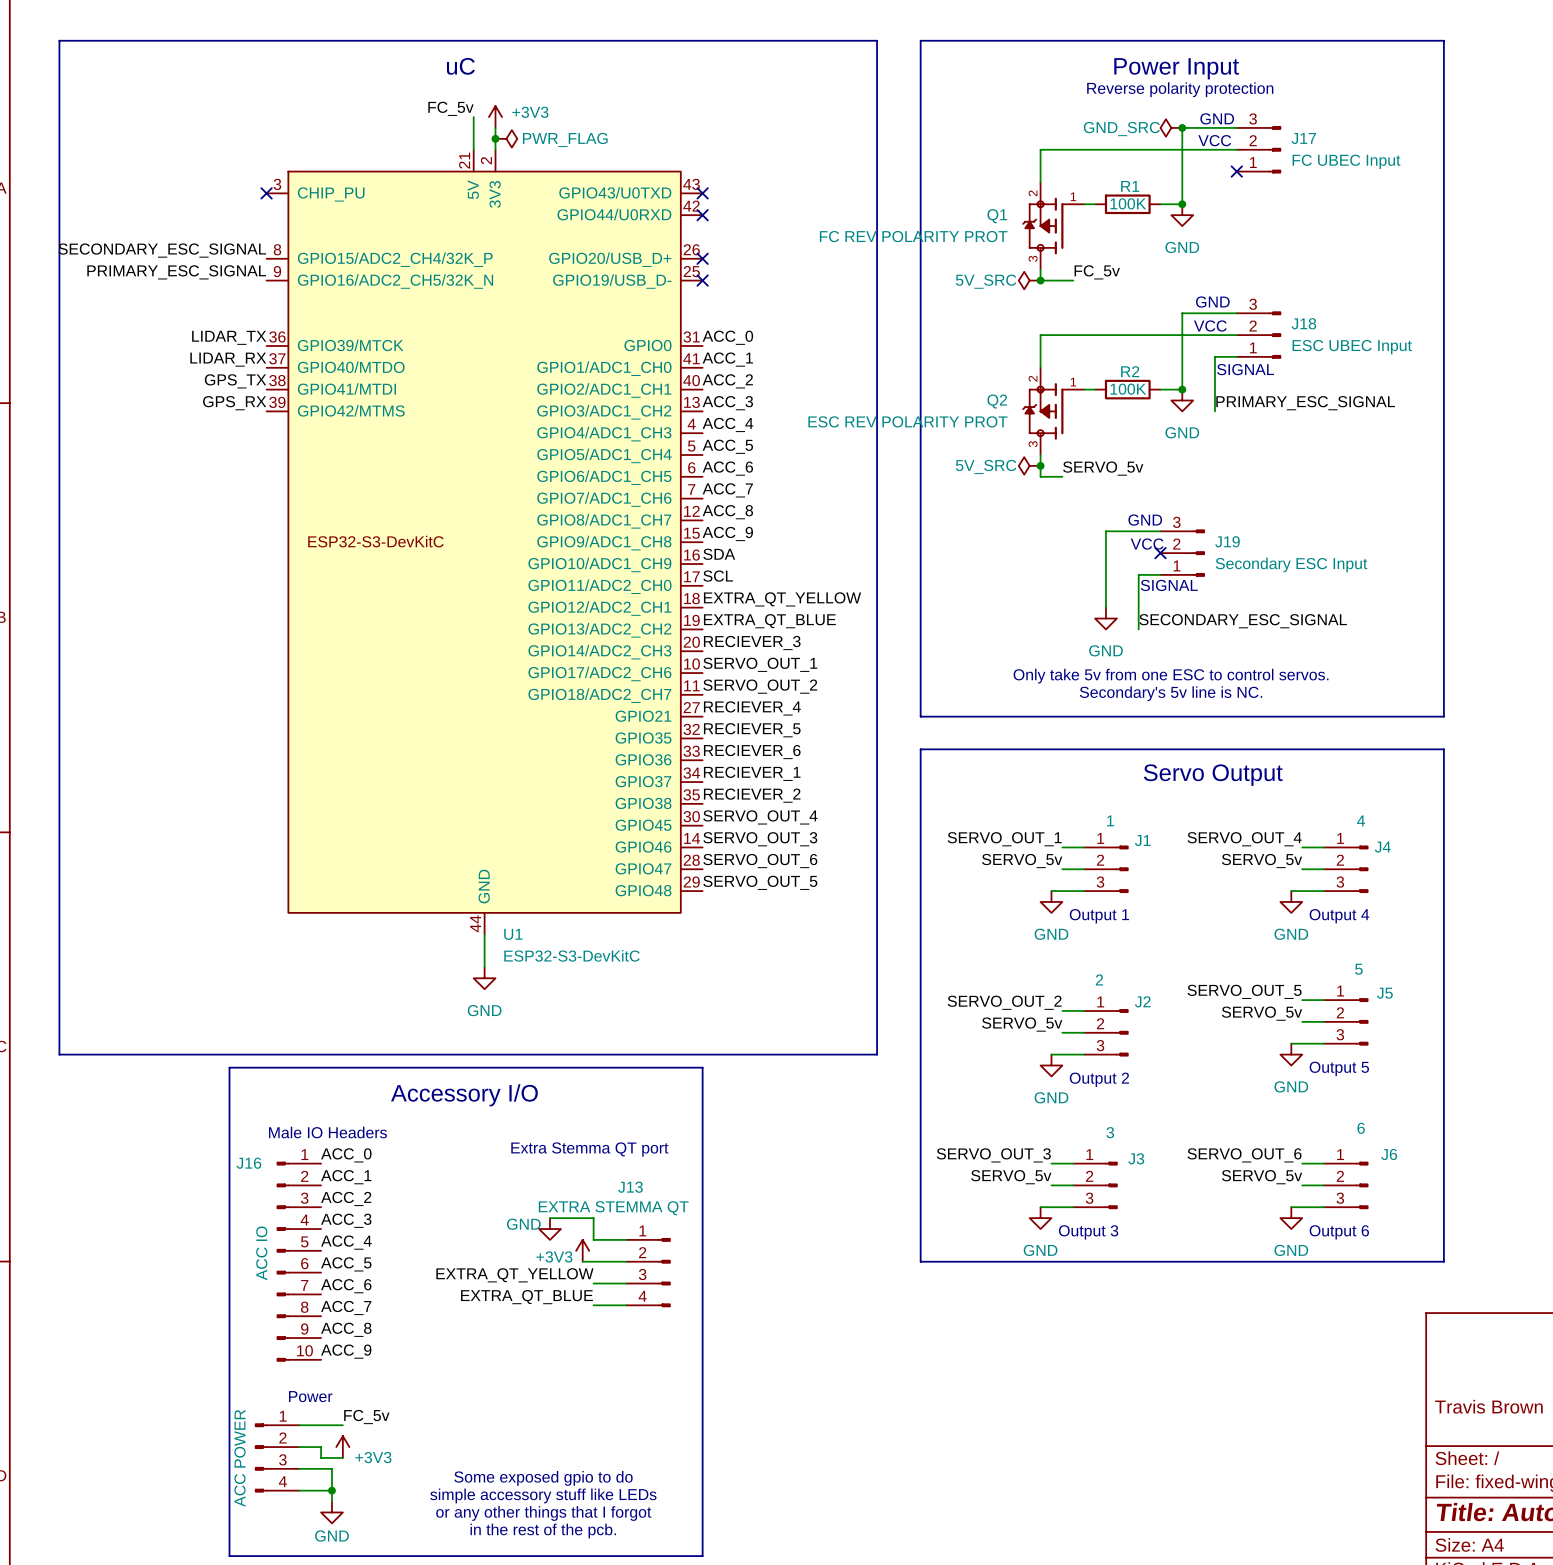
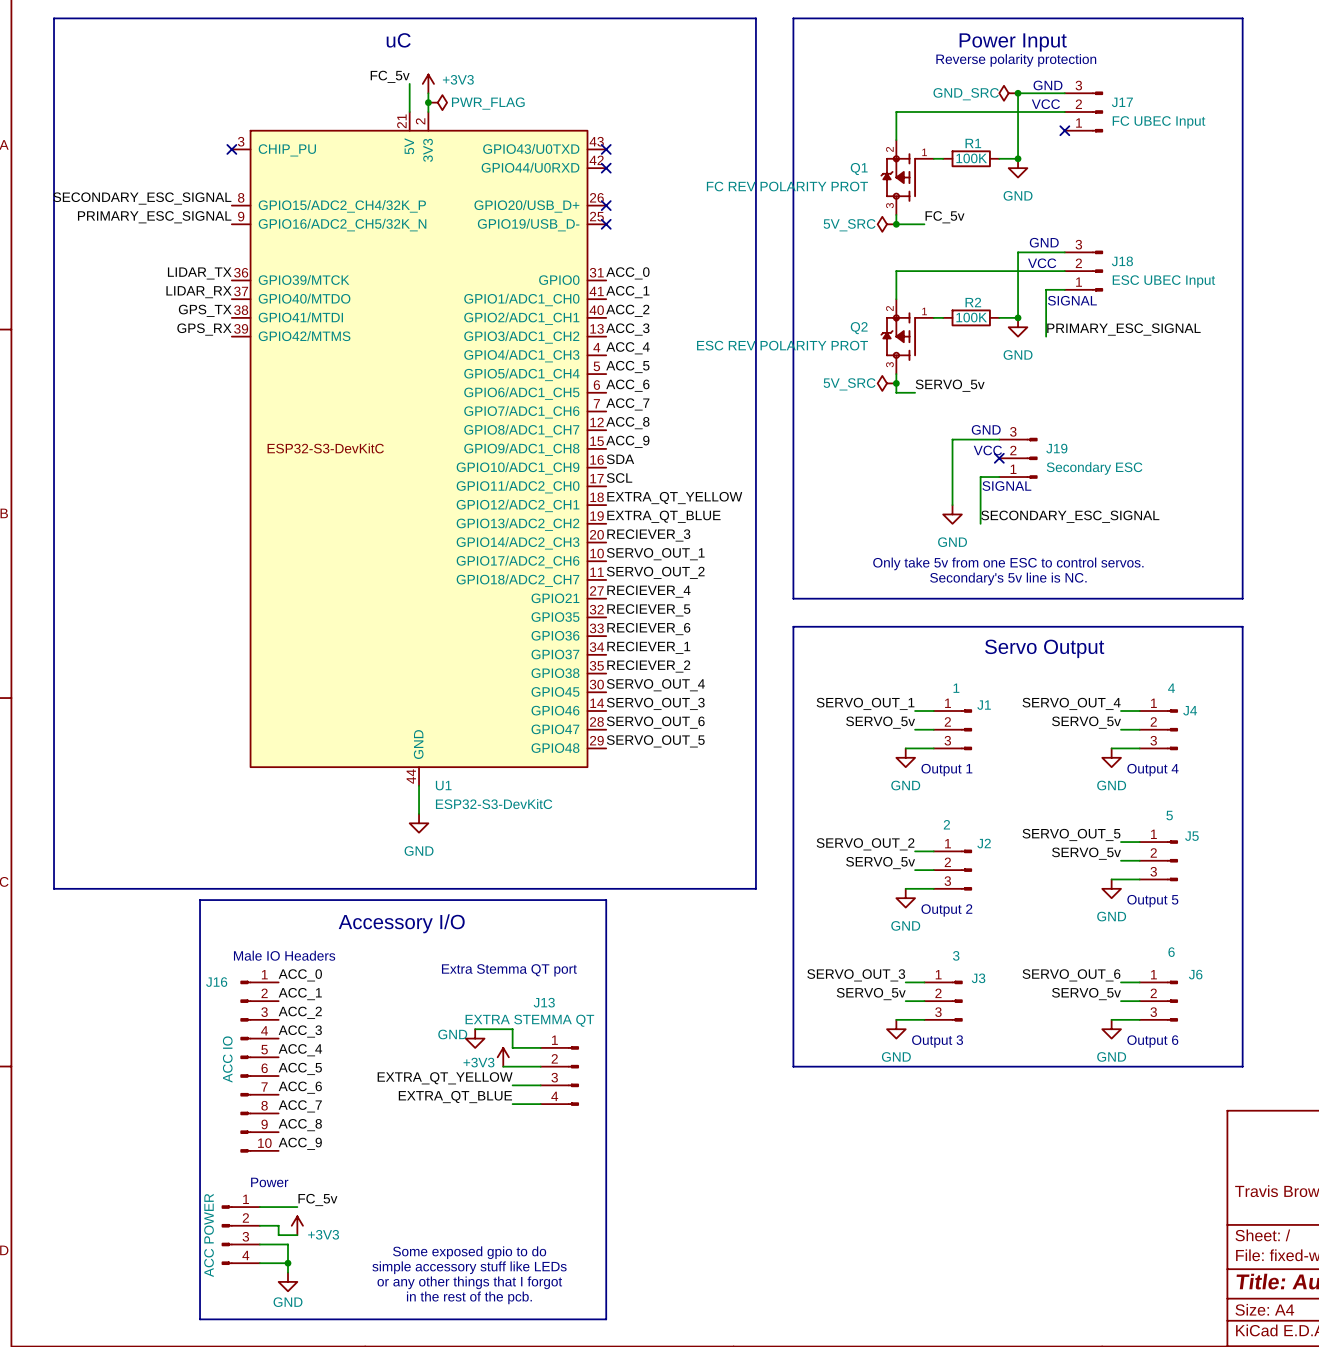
J19 value: Secondary ESC Input (1291, 564) -> Secondary ESC (1094, 468)

